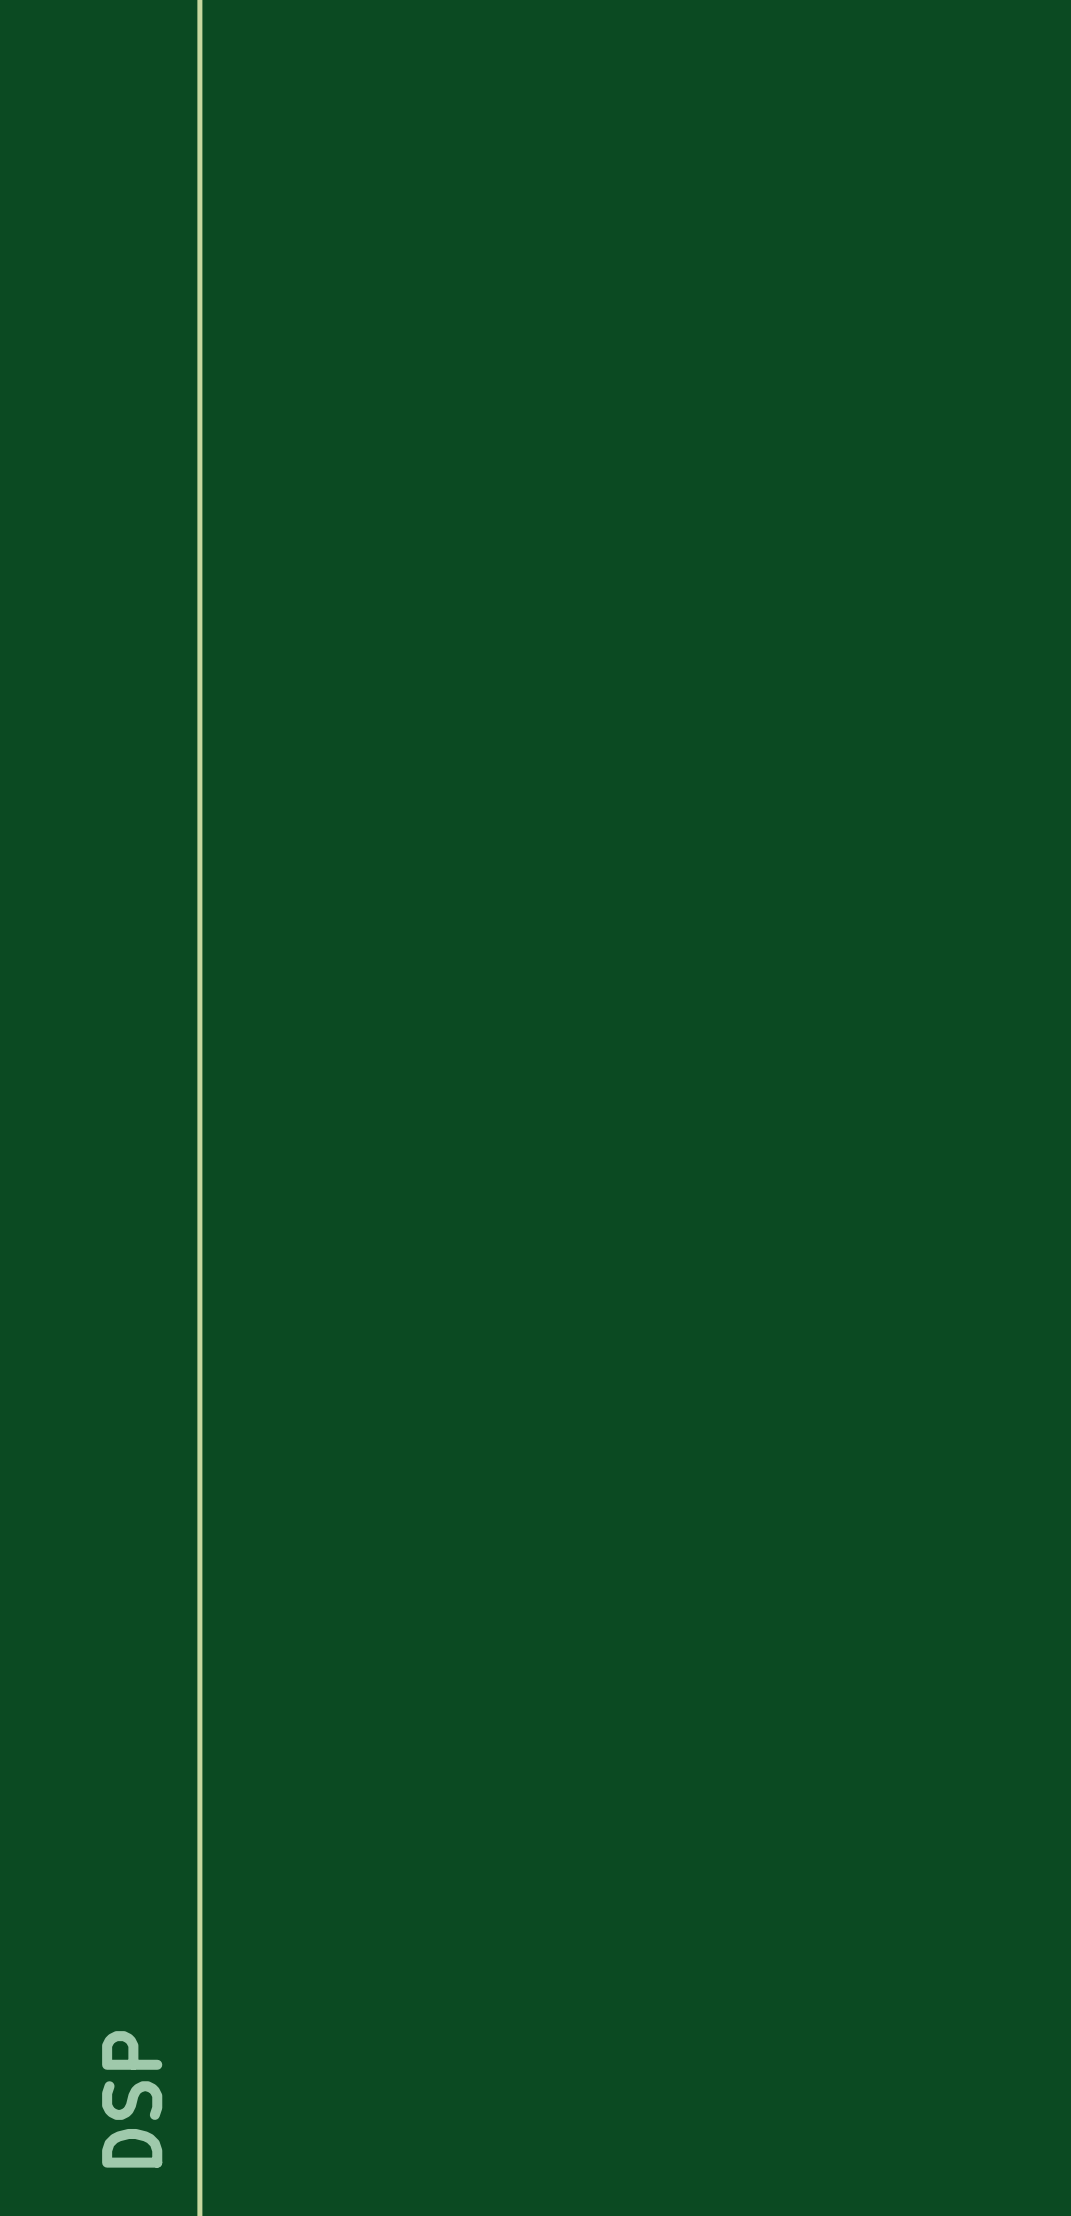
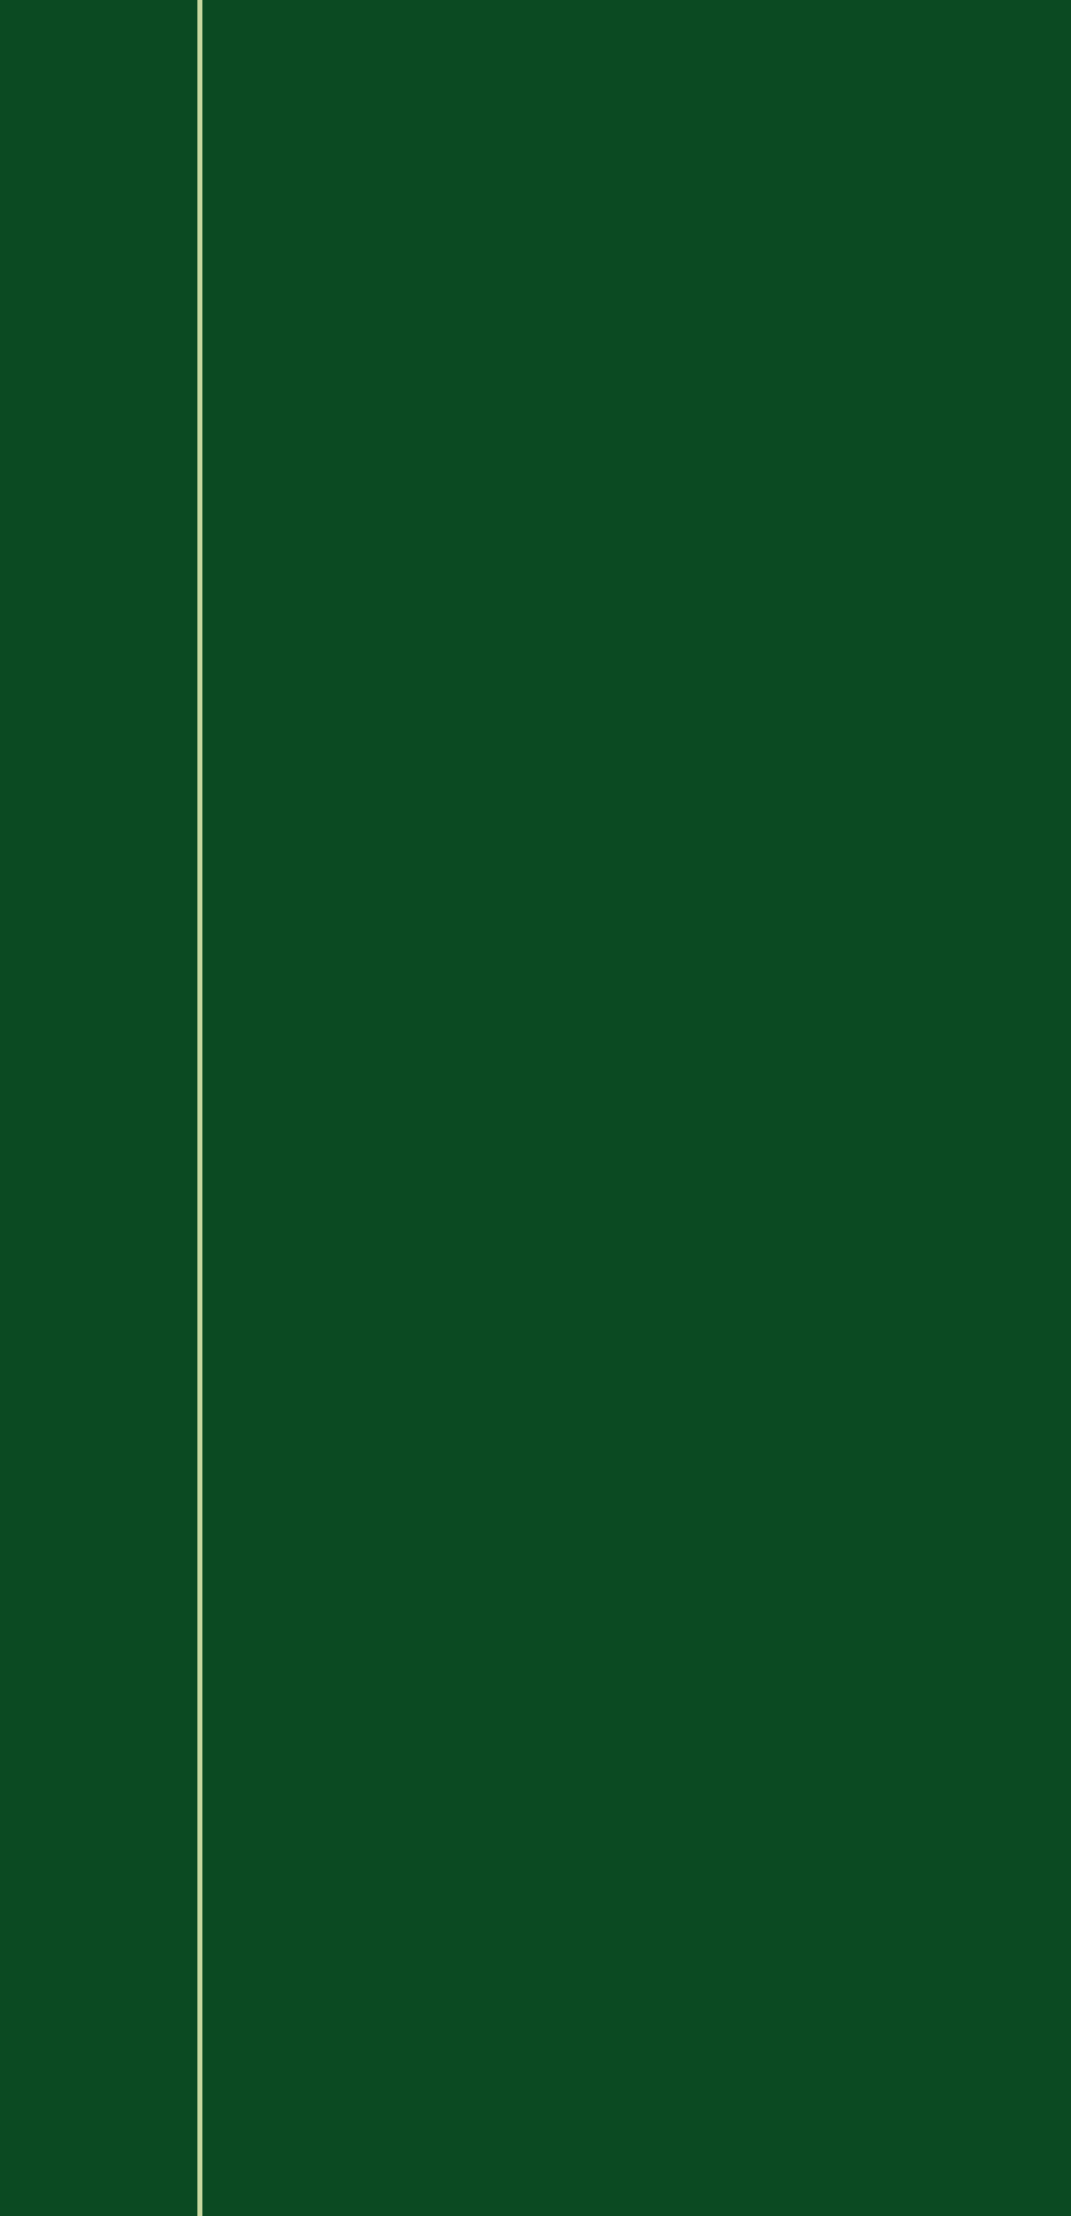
text: DSP (132, 2099) -> none

